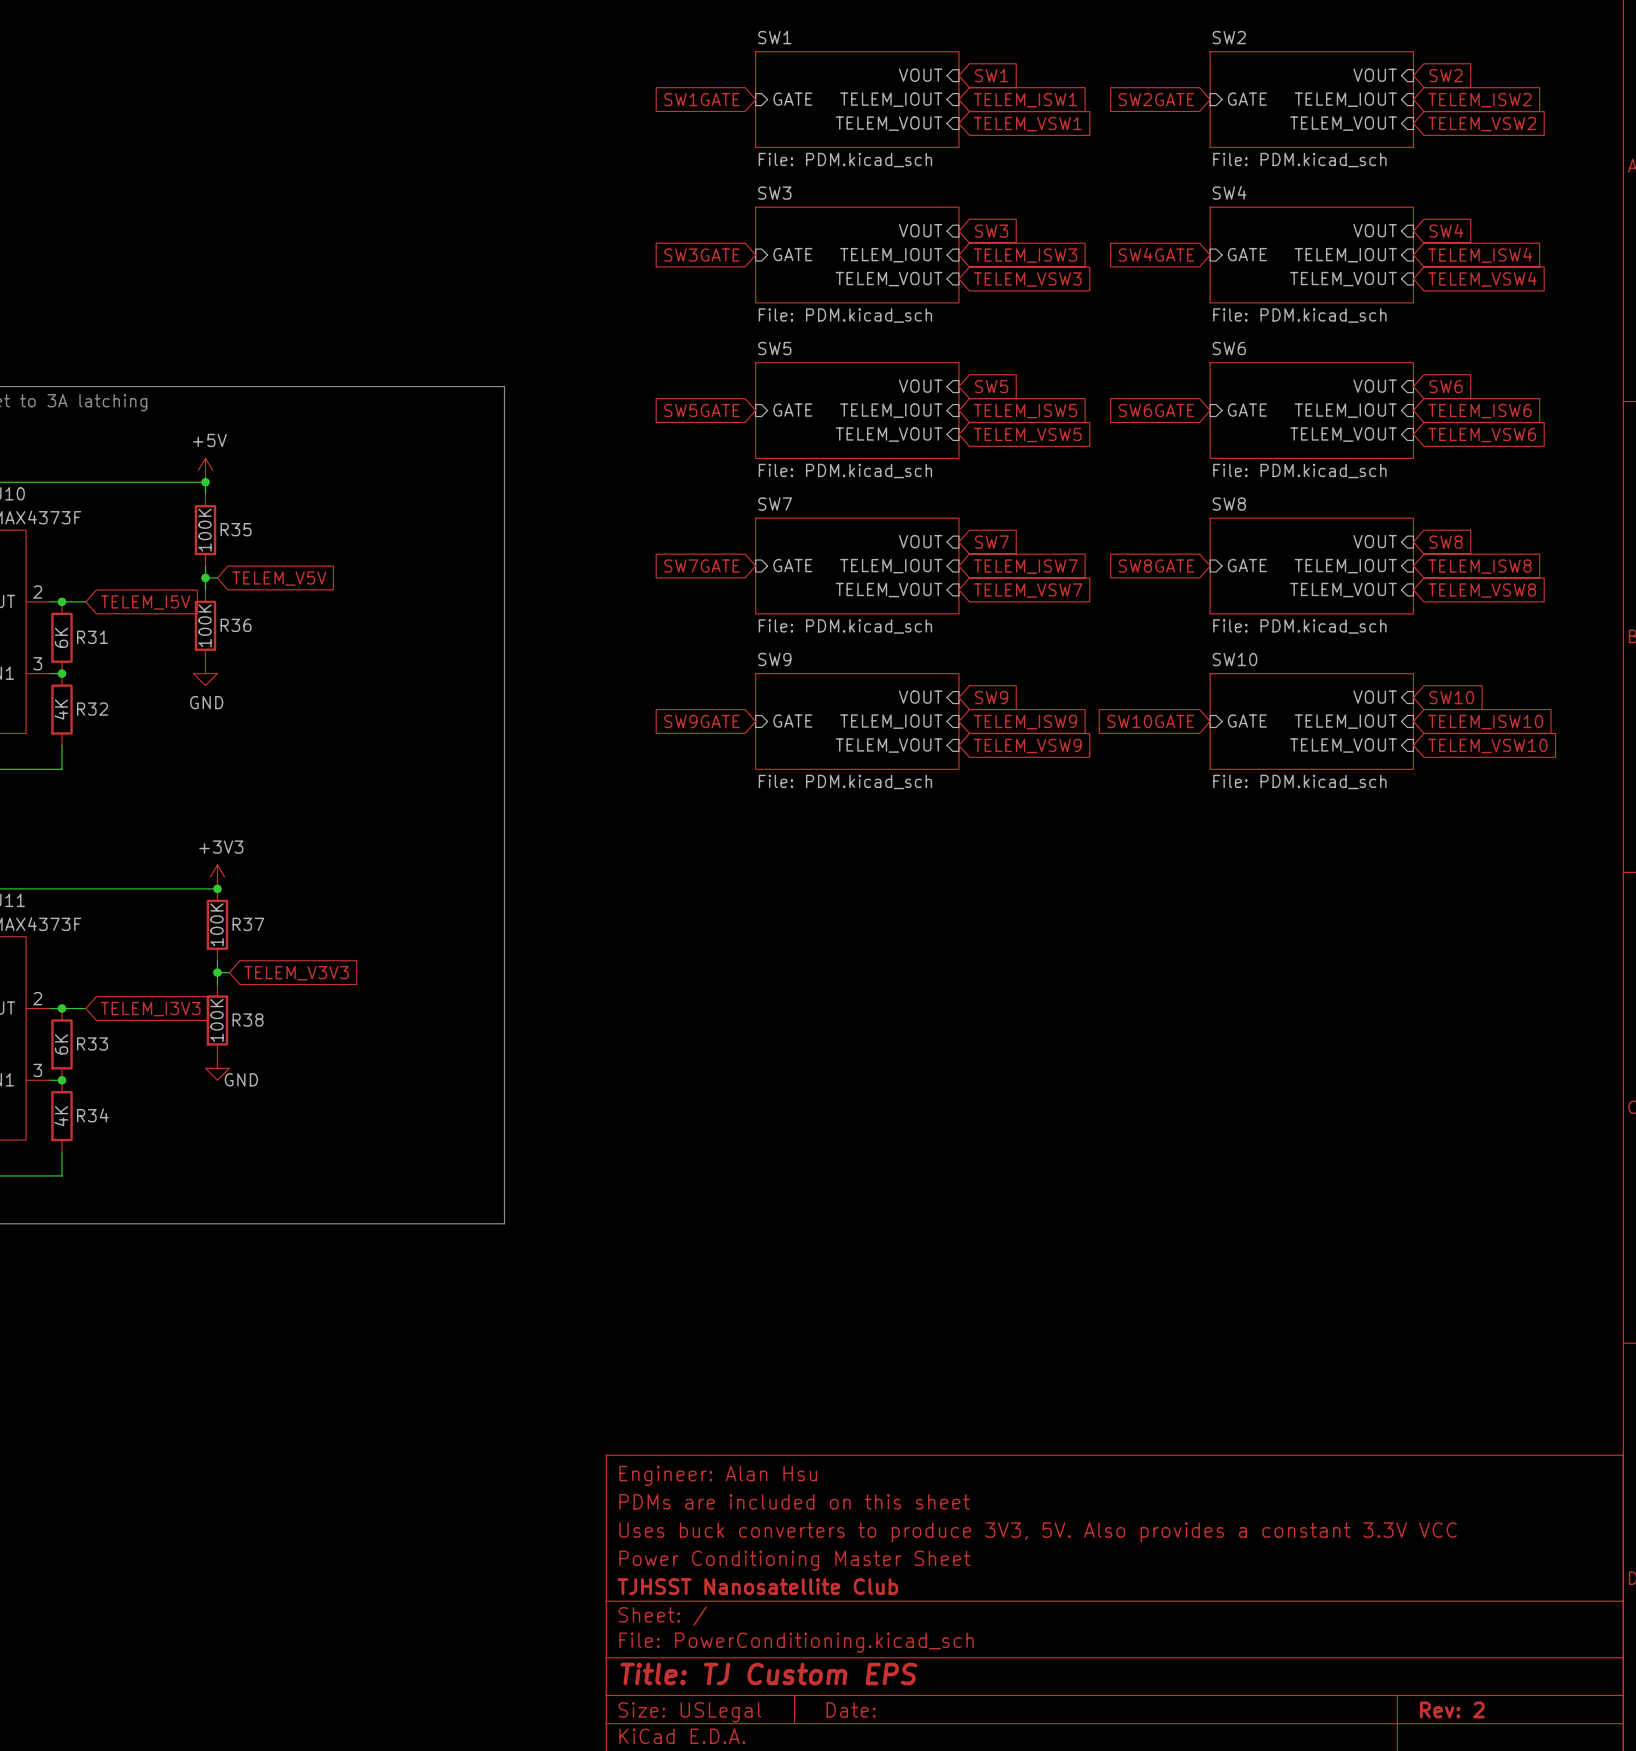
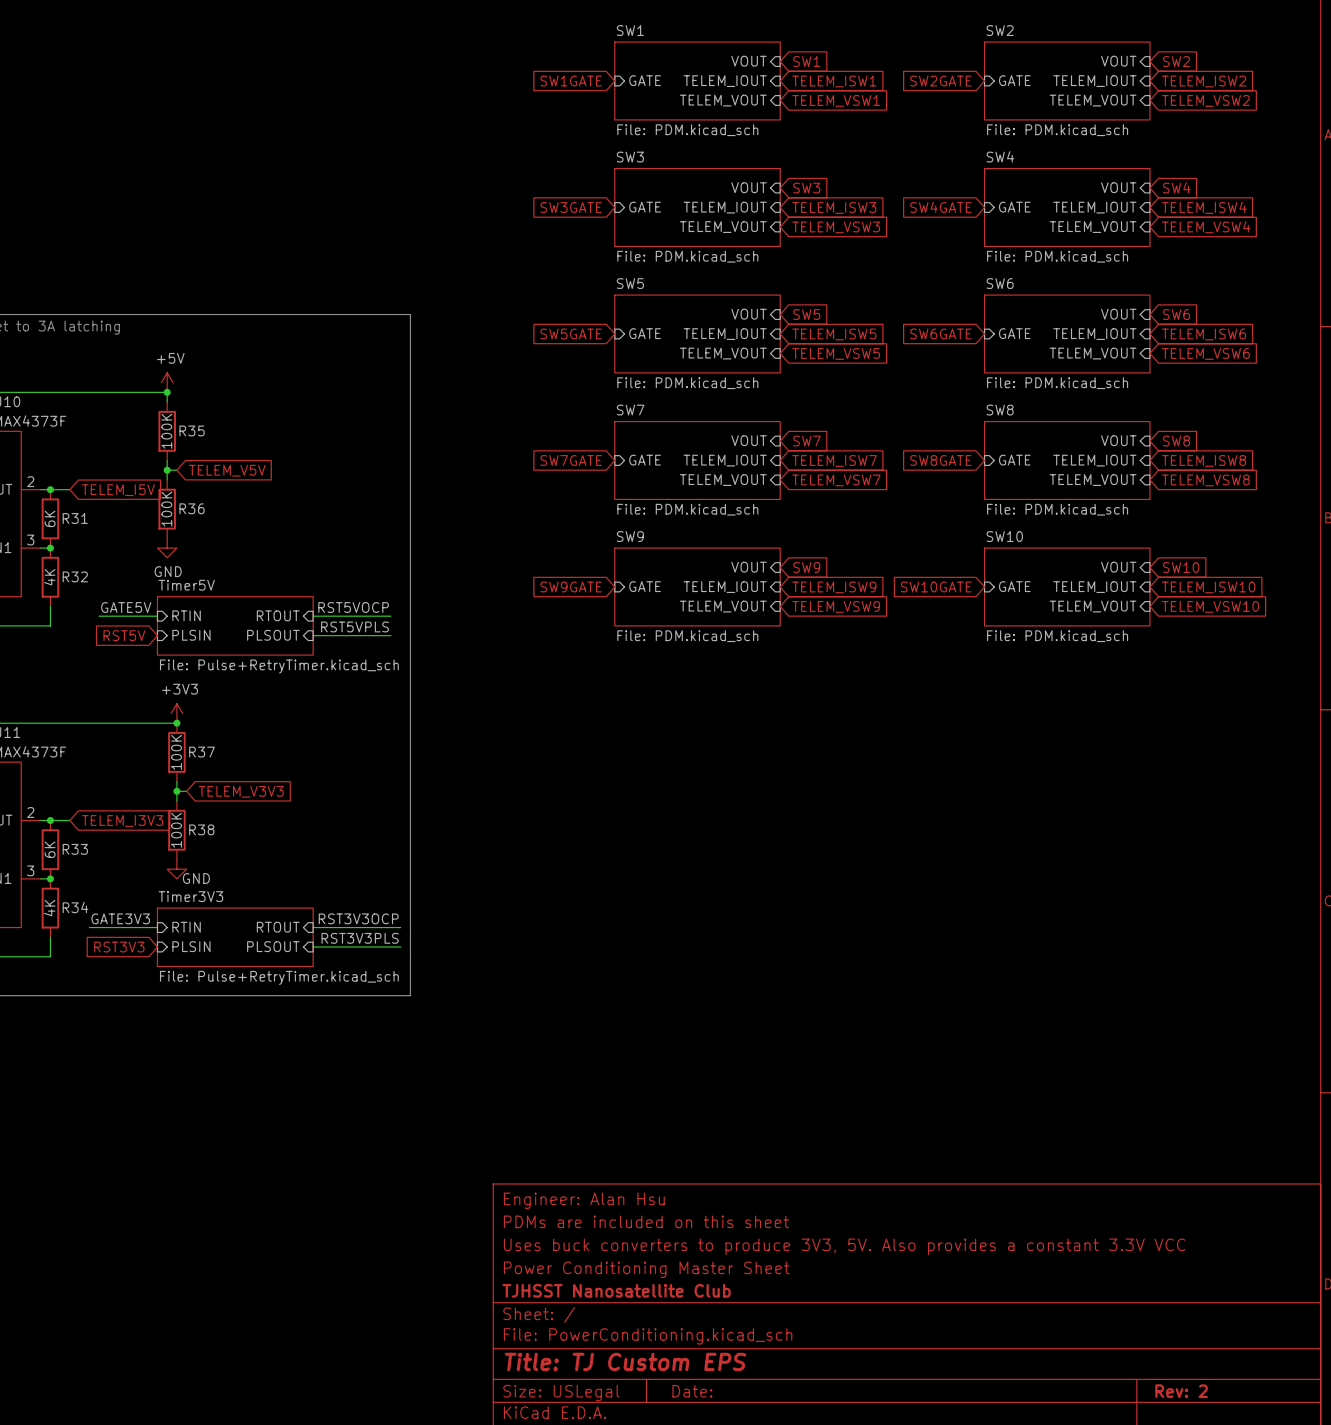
label: none -> GATE5V (126, 607)
label: none -> RST5VOCP (353, 607)
sheet pin: none -> RTIN (186, 615)
sheet pin: none -> RTOUT (278, 615)
wire: none -> (99, 616) (157, 616)
wire: none -> (313, 616) (390, 616)
sheet Timer5V: none -> File: Pulse+RetryTimer.kicad_sch (235, 625)
label: none -> RST5VPLS (355, 626)
sheet pin: none -> PLSIN (191, 635)
sheet pin: none -> PLSOUT (273, 635)
global label: none -> RST5V (124, 635)
wire: none -> (313, 635) (390, 635)
label: none -> GATE3V3 (120, 918)
label: none -> RST3V3OCP (358, 918)
sheet pin: none -> RTIN (186, 927)
sheet pin: none -> RTOUT (278, 927)
wire: none -> (89, 927) (157, 927)
wire: none -> (313, 927) (400, 927)
sheet Timer3V3: none -> File: Pulse+RetryTimer.kicad_sch (235, 937)
label: none -> RST3V3PLS (360, 938)
global label: none -> RST3V3 (119, 947)
sheet pin: none -> PLSIN (191, 946)
sheet pin: none -> PLSOUT (273, 946)
wire: none -> (313, 947) (400, 947)

